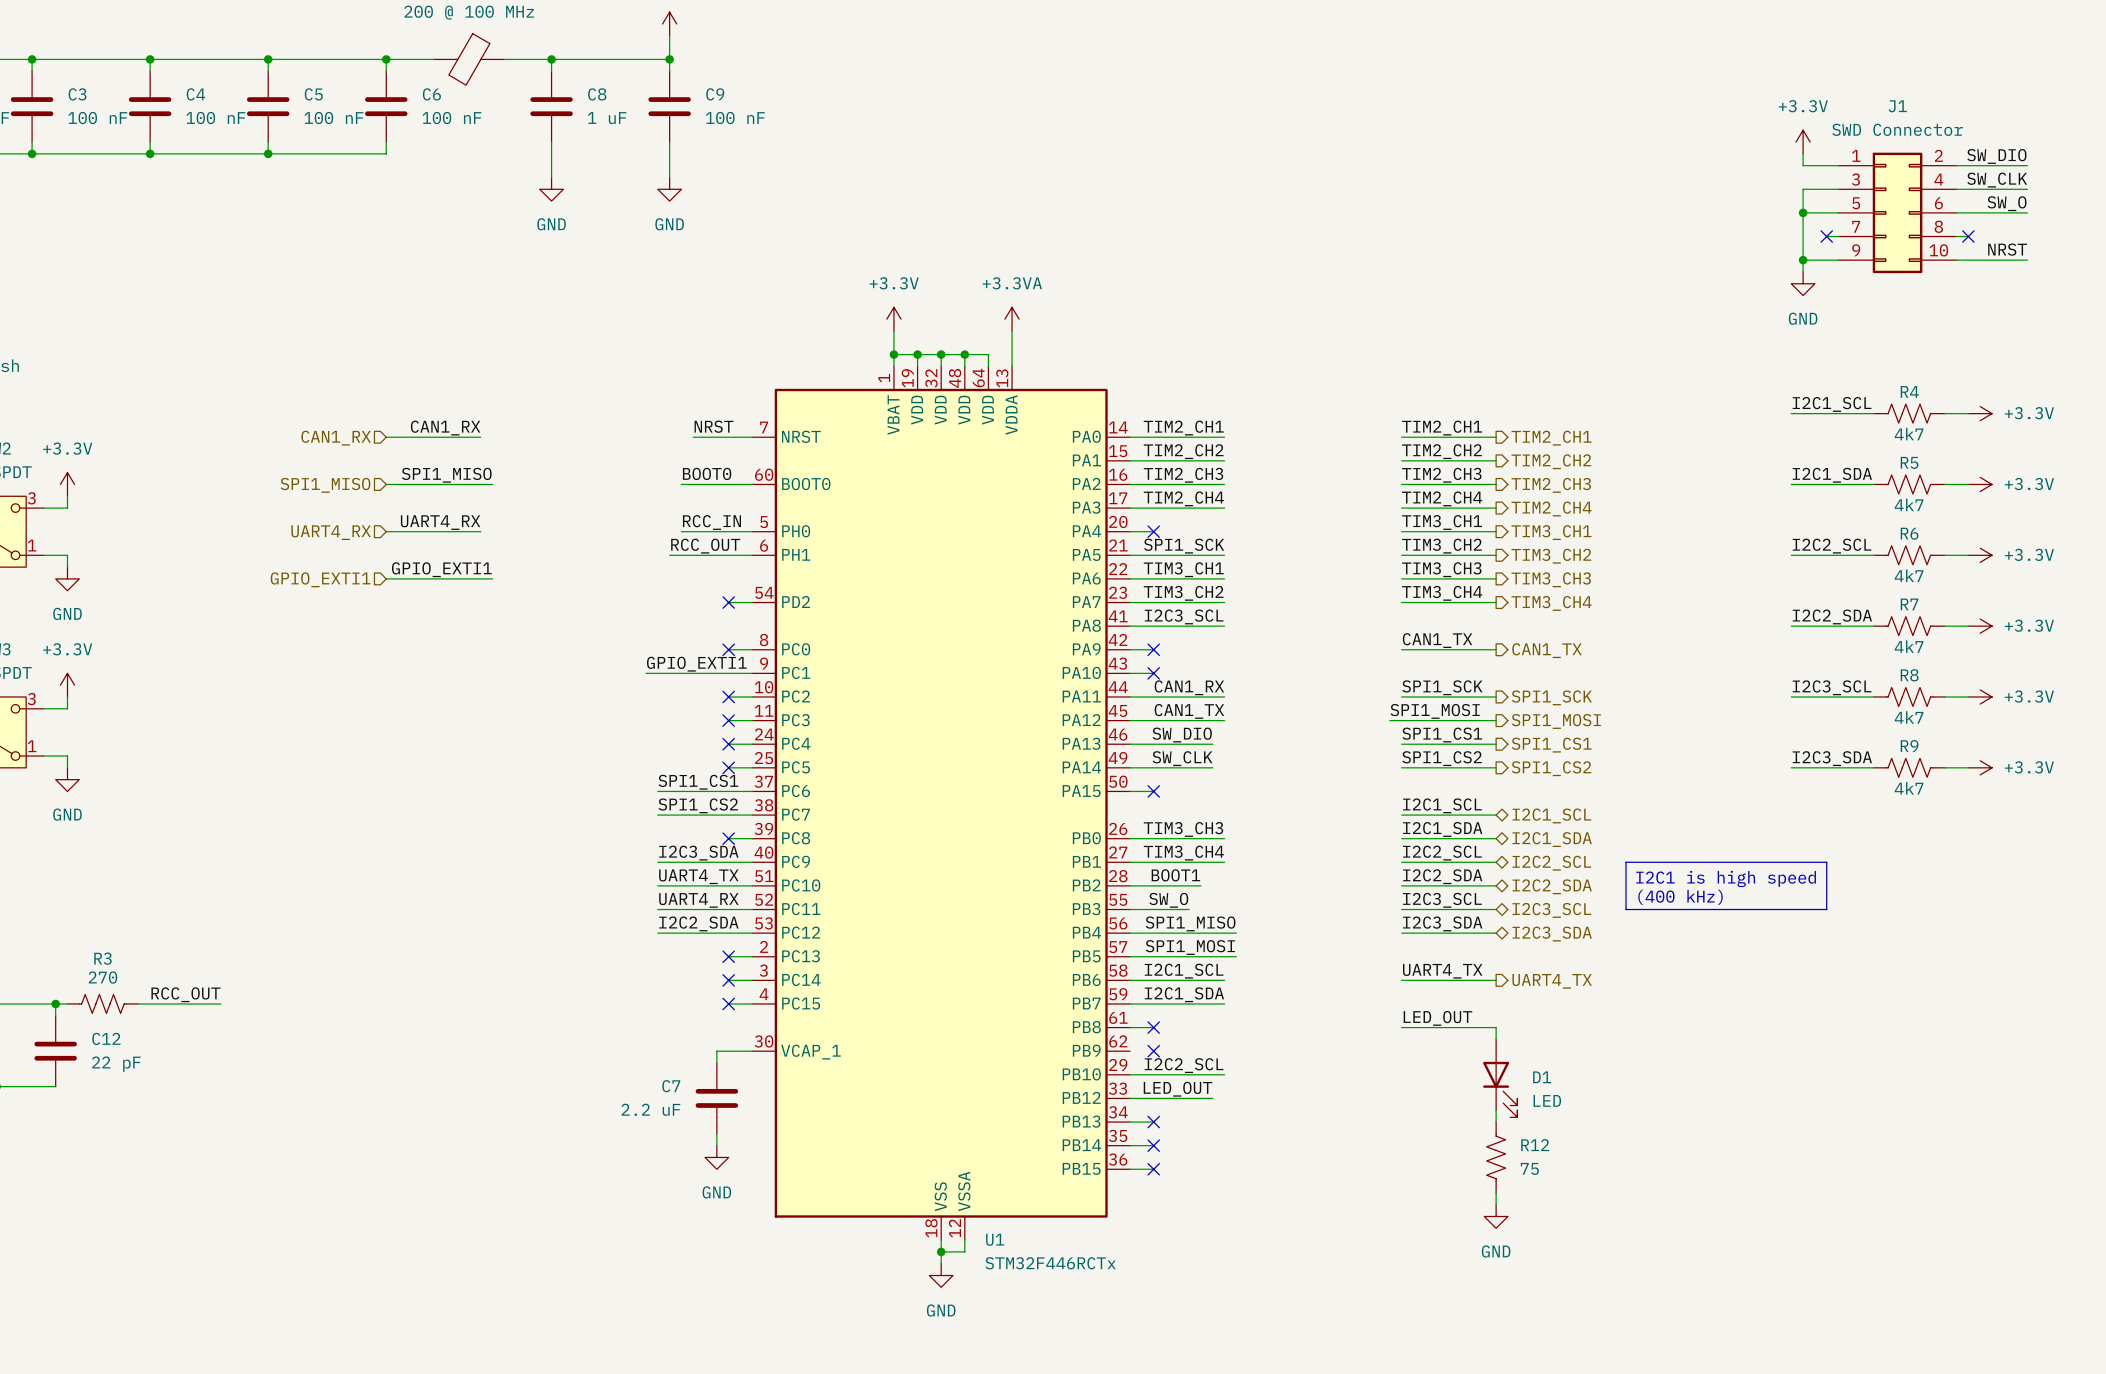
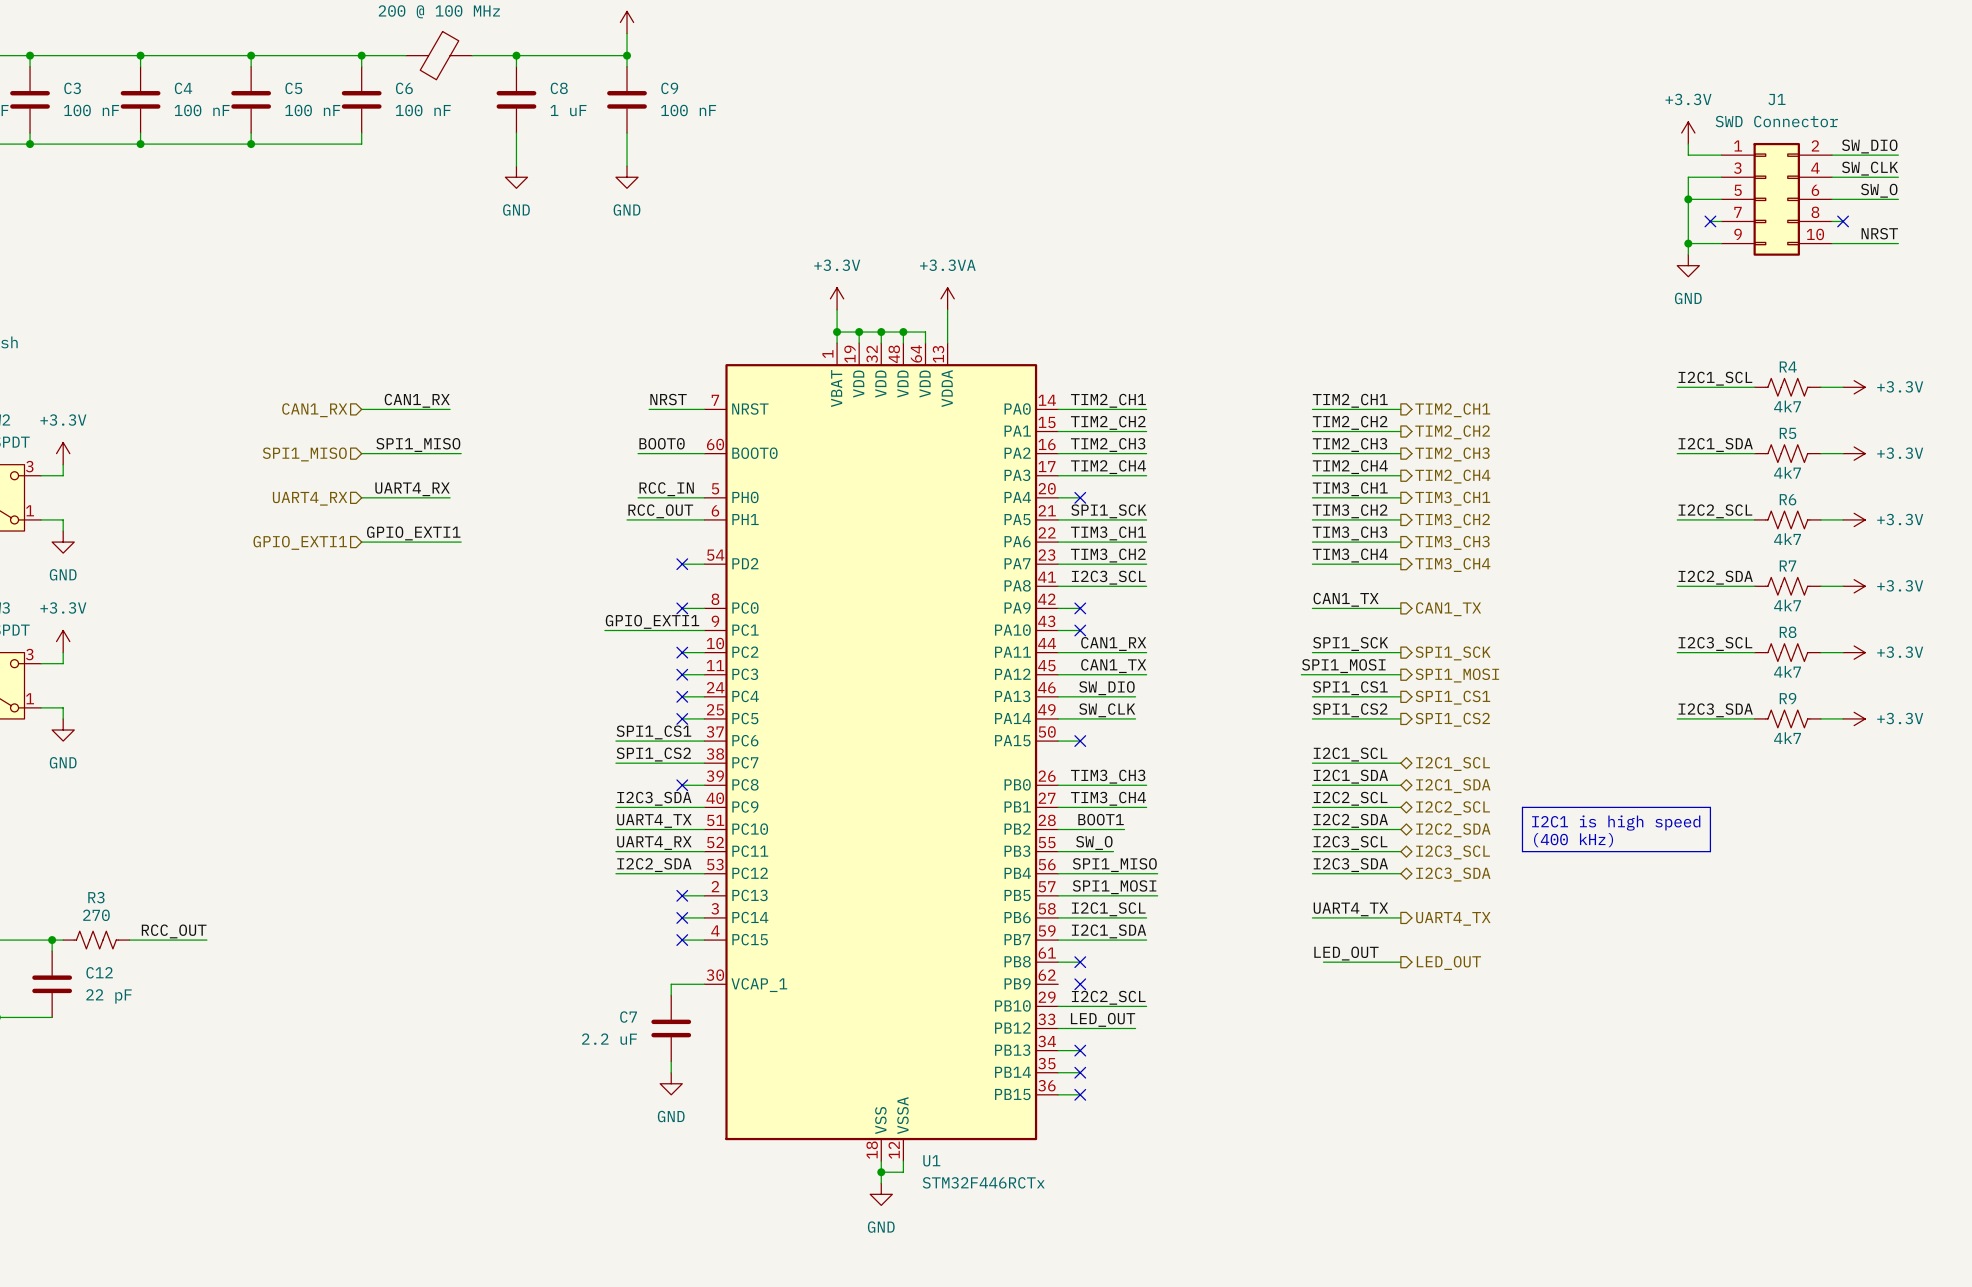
wire: (1401, 1027) (1413, 1027) -> none
hierarchical label: none -> LED_OUT (1448, 962)
D1: LED (1500, 1078) -> none
wire: (1496, 1110) (1496, 1122) -> none
R12: 75 (1496, 1157) -> none
wire: (1496, 1192) (1496, 1204) -> none
power symbol: GND (1496, 1216) -> none

